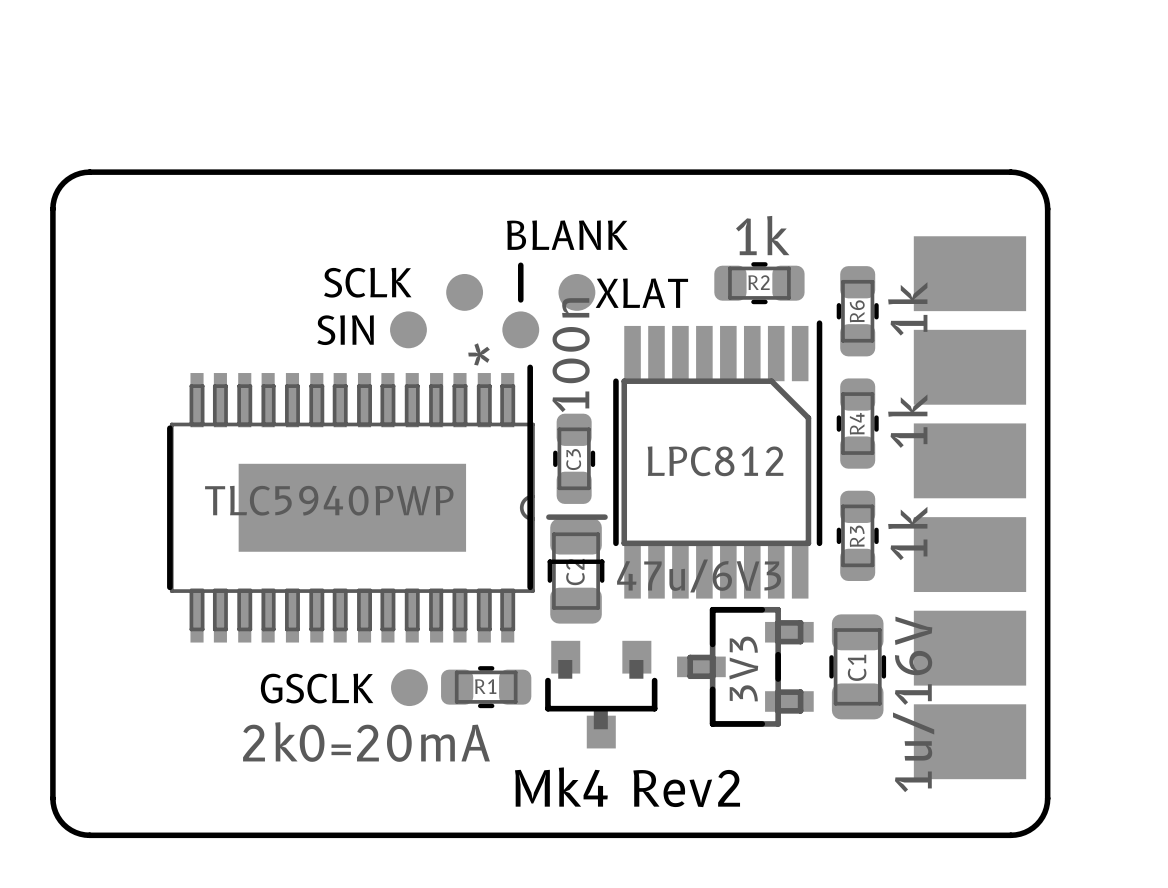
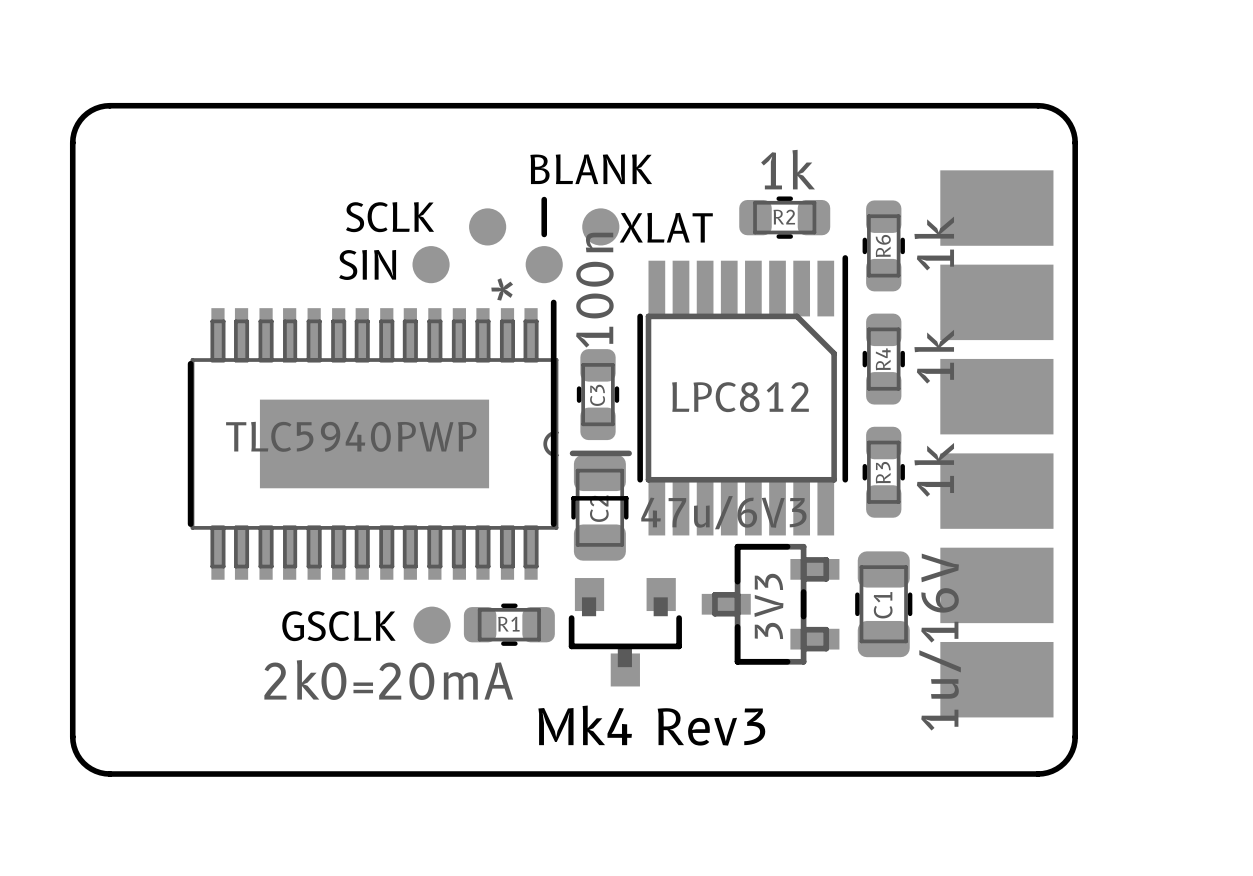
text: Mk4 Rev2 (627, 787) -> Mk4 Rev3 (651, 725)

